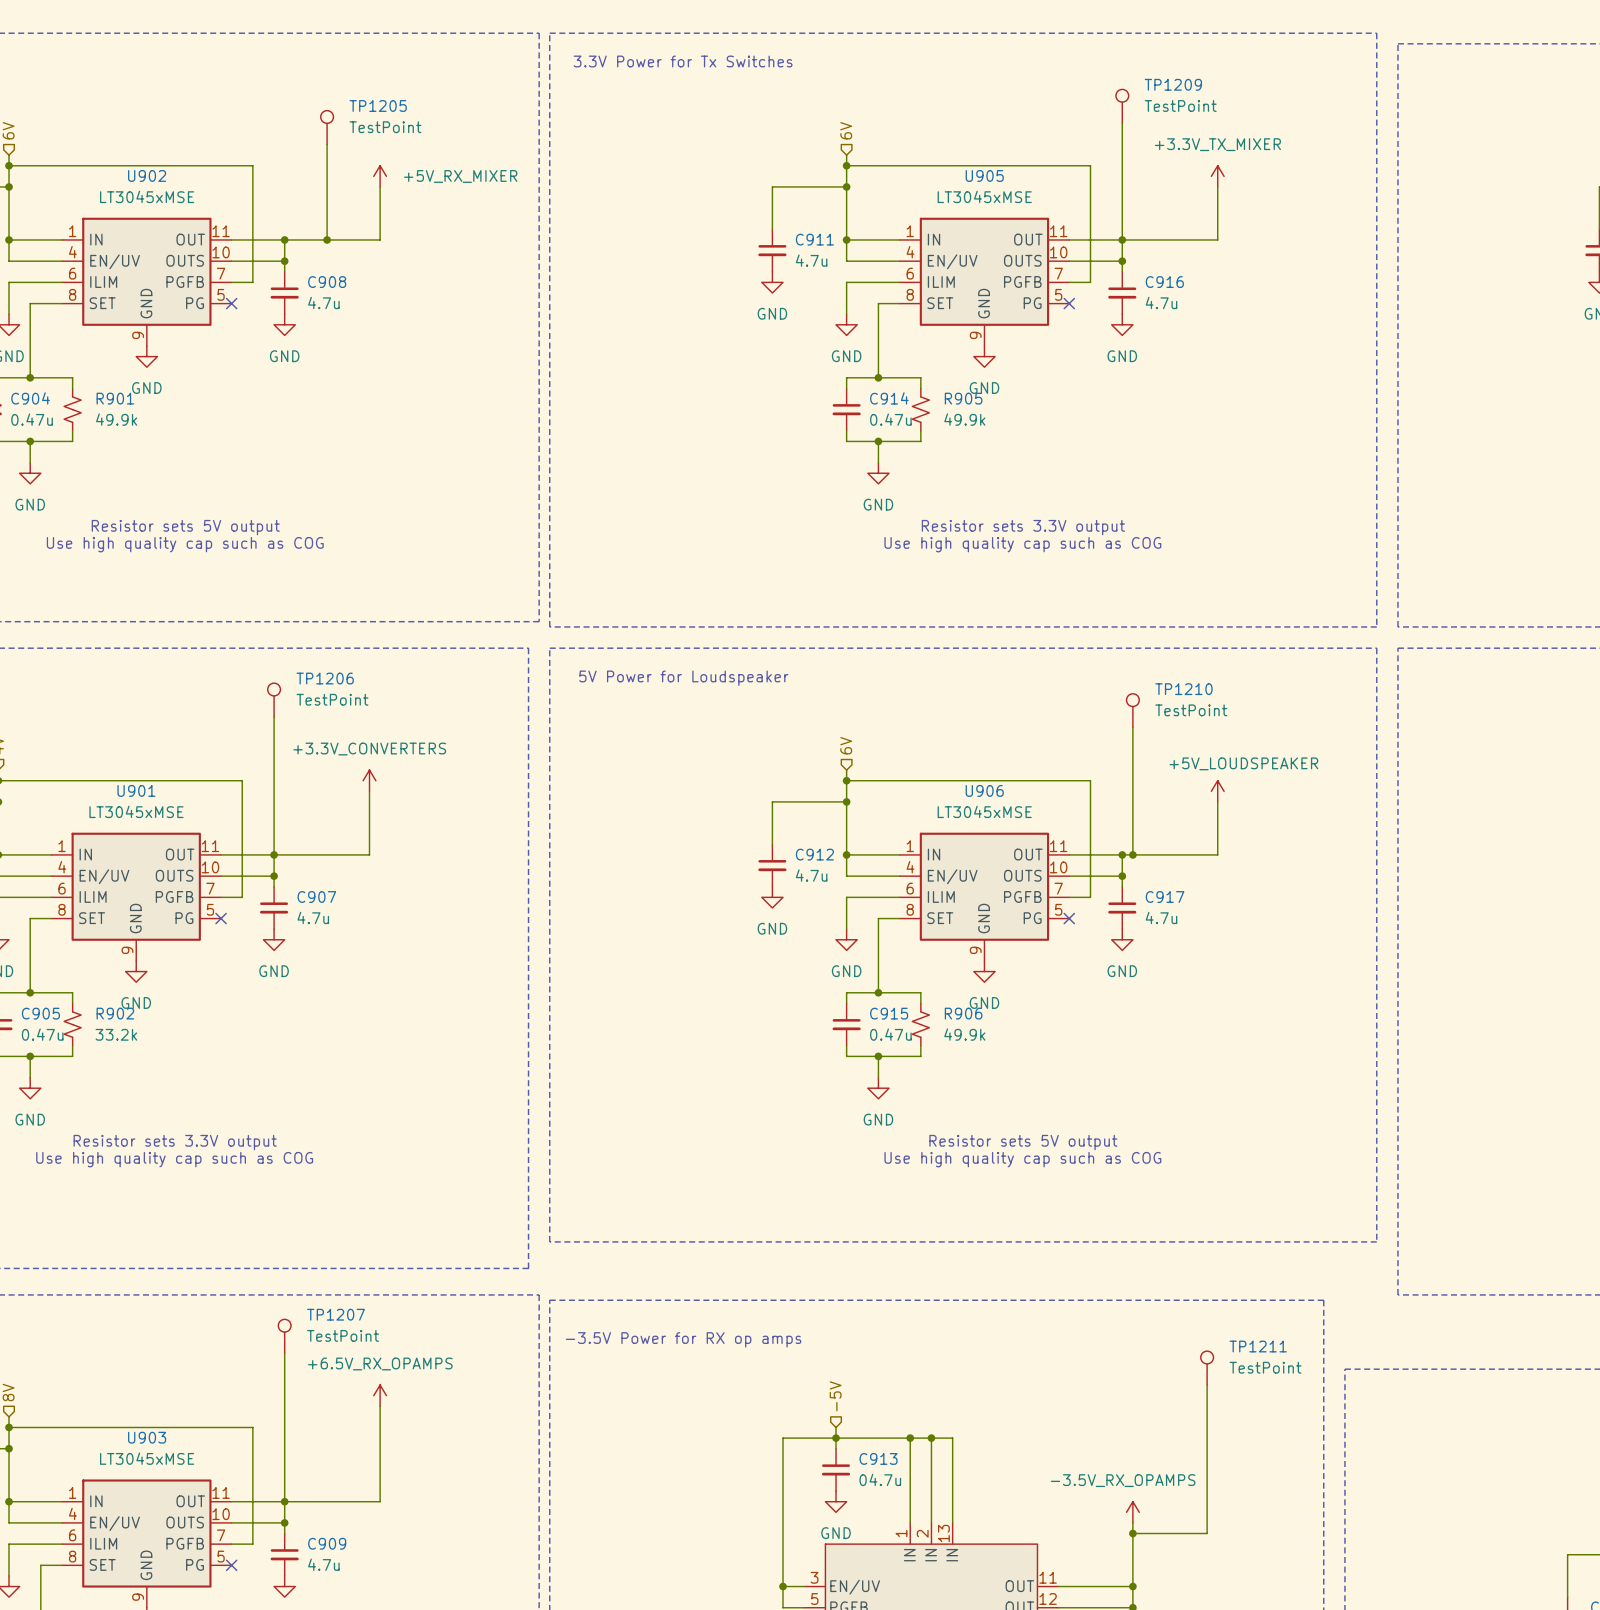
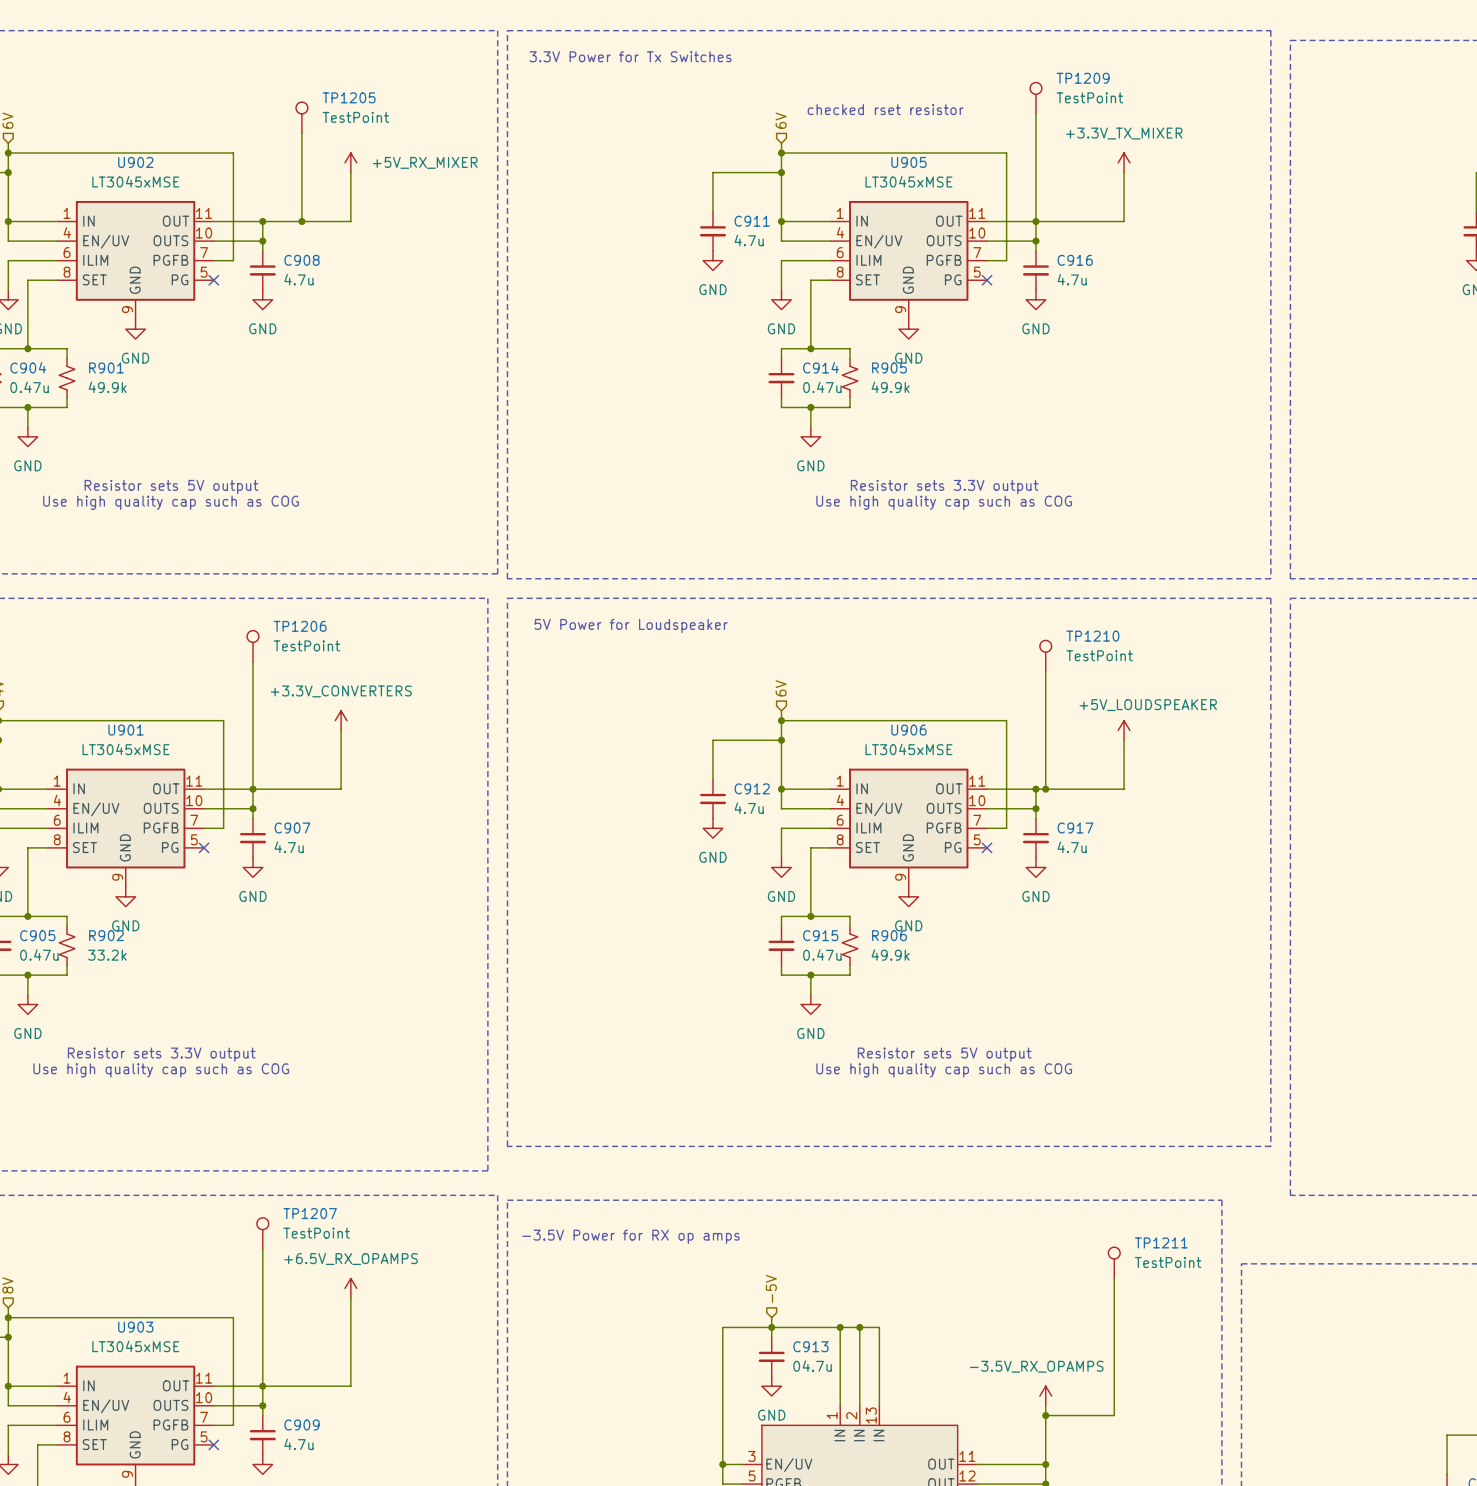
text: none -> checked rset resistor (885, 109)

